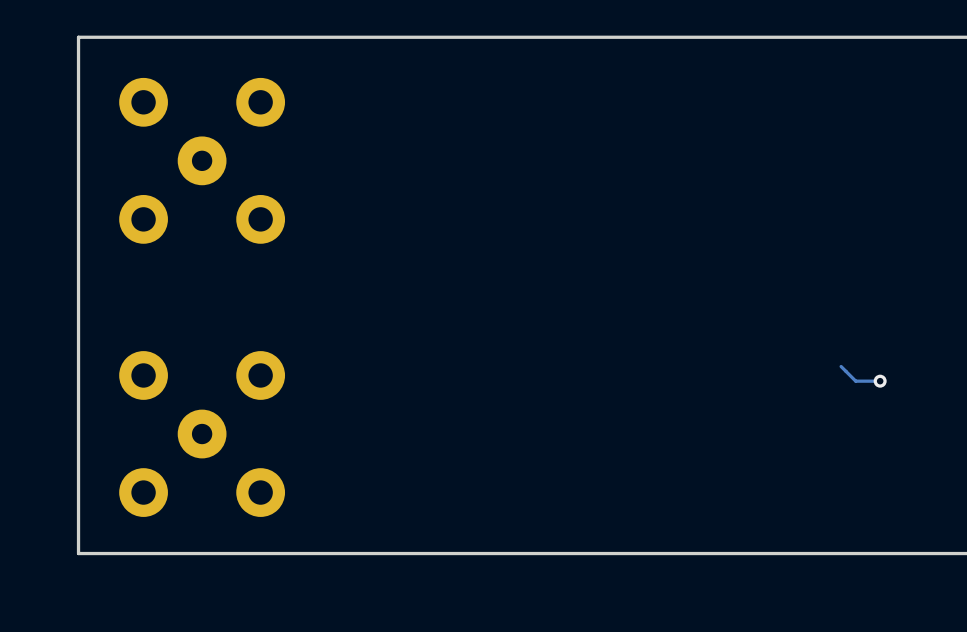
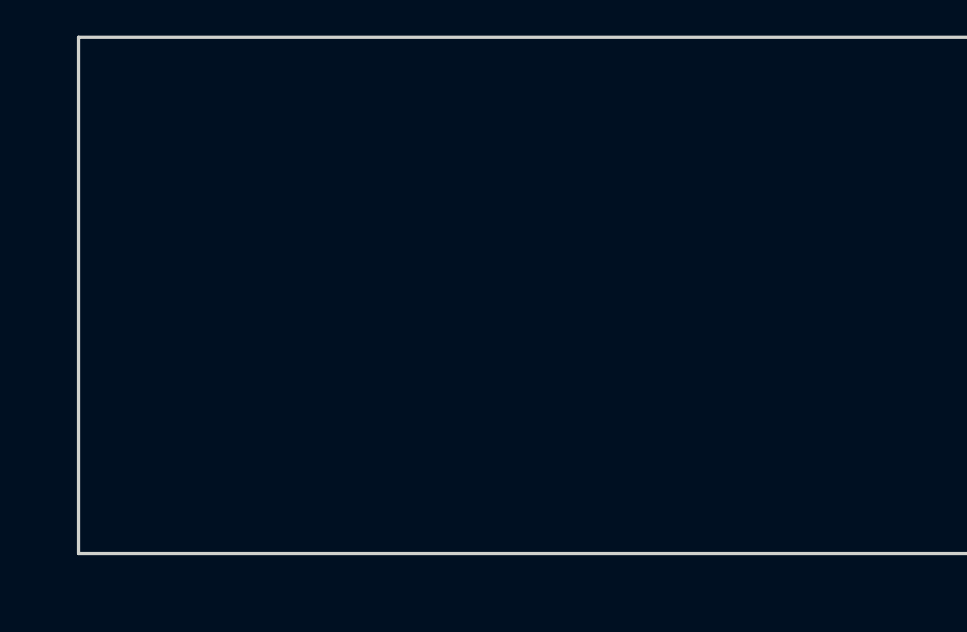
part: (202, 160) -> none
track: (841, 366) (855, 381) (879, 381) -> none
via: (880, 381) -> none
part: (202, 434) -> none

